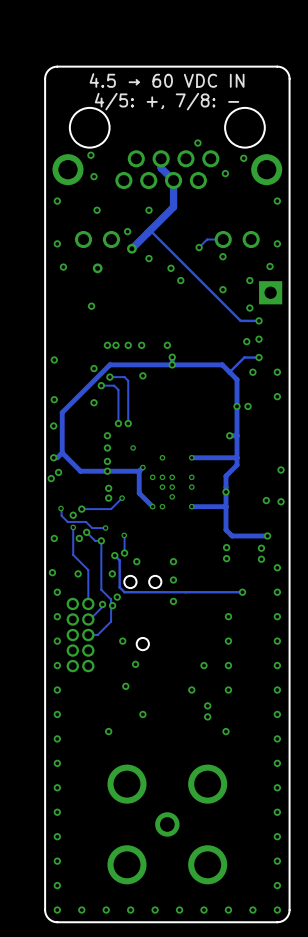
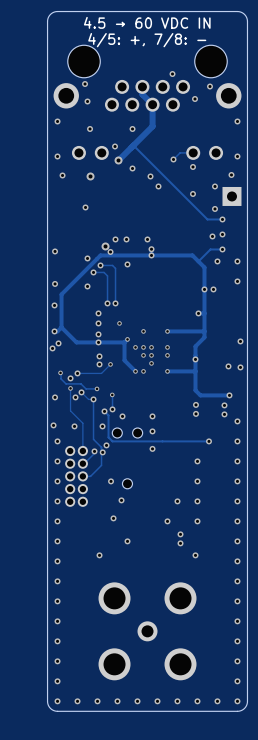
via: (107, 345) -> none
via: (116, 345) -> none
via: none -> (105, 246)
via: none -> (110, 251)

